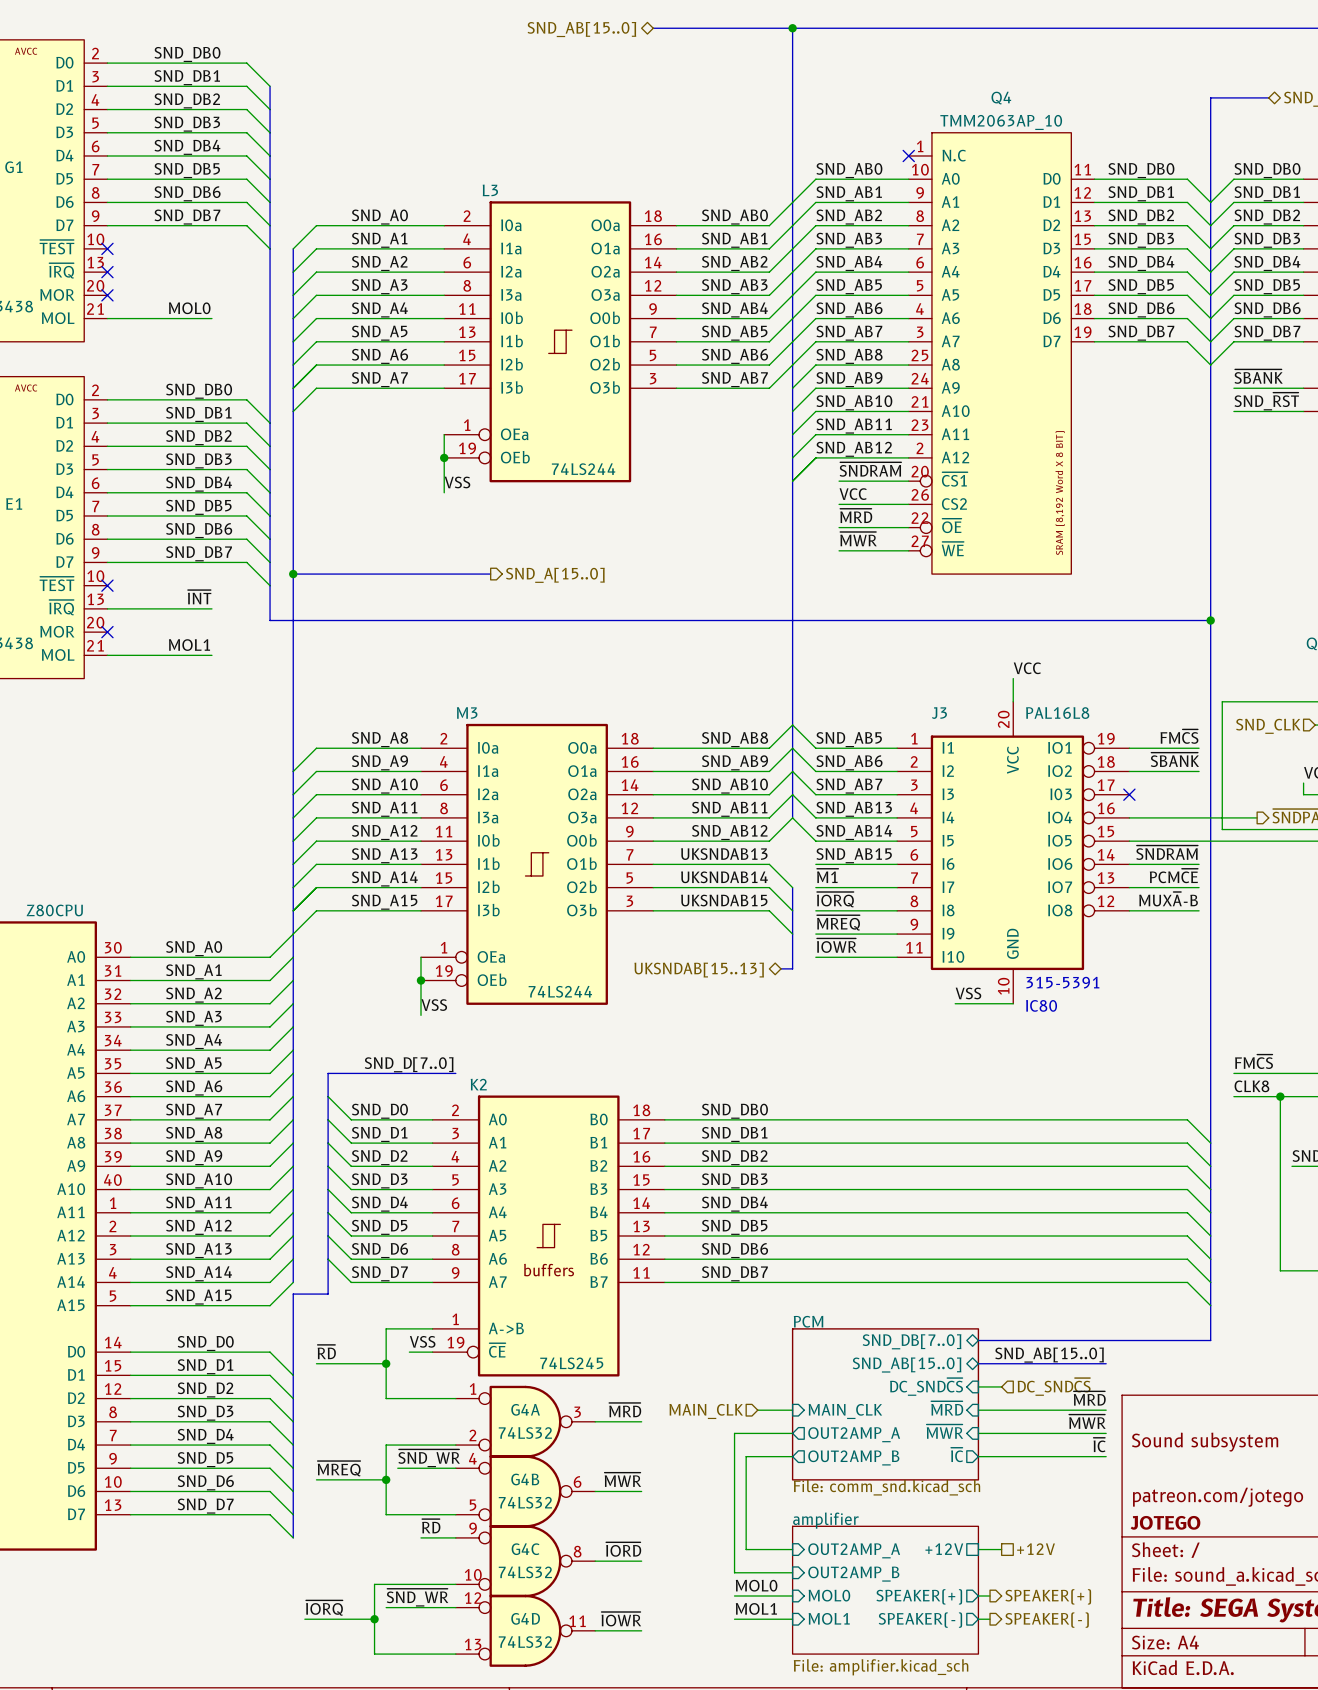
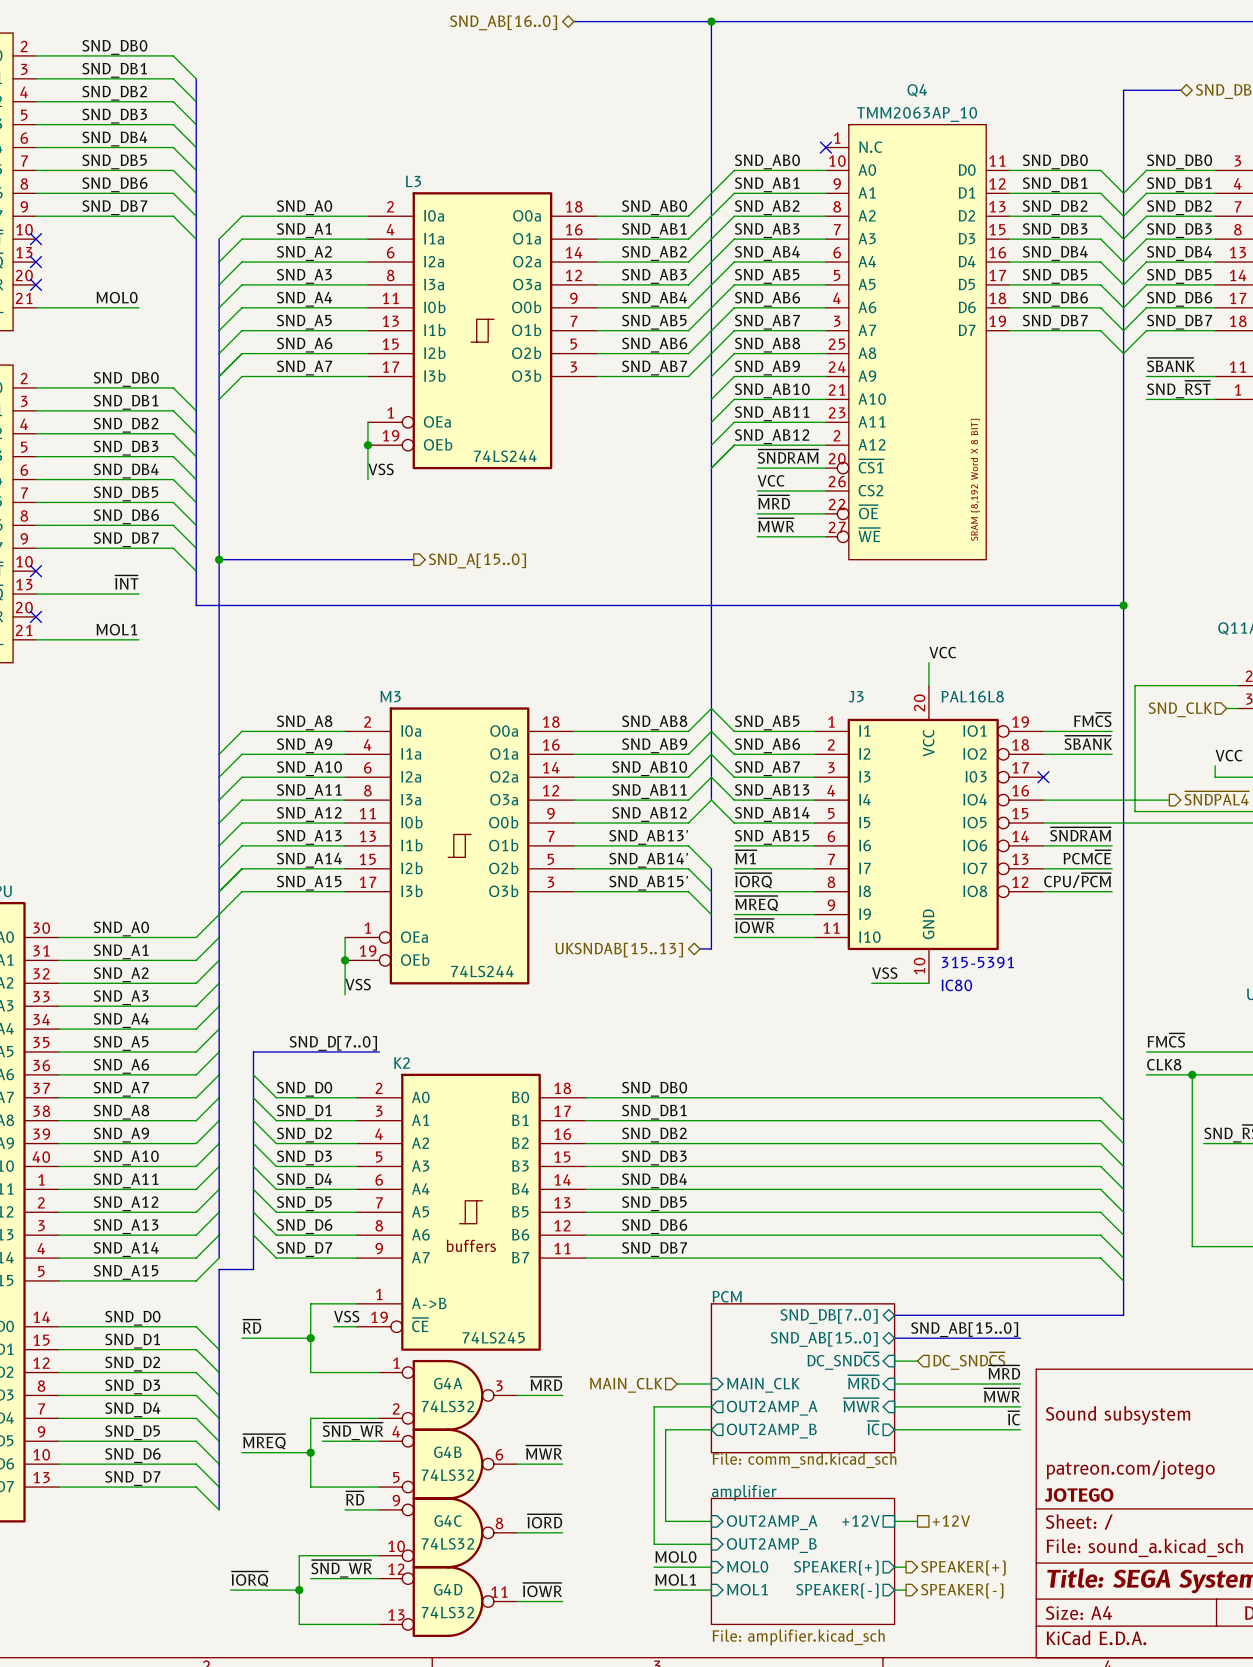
hierarchical label: SND_AB[15..0] (581, 29) -> SND_AB[16..0] (503, 22)
label: UKSNDAB13 (724, 854) -> SND_AB13' (648, 837)
label: UKSNDAB14 (724, 877) -> SND_AB14' (648, 860)
label: MUX~{A}-B (1168, 899) -> CPU/~{PCM} (1077, 880)
label: UKSNDAB15 (724, 900) -> SND_AB15' (648, 883)

